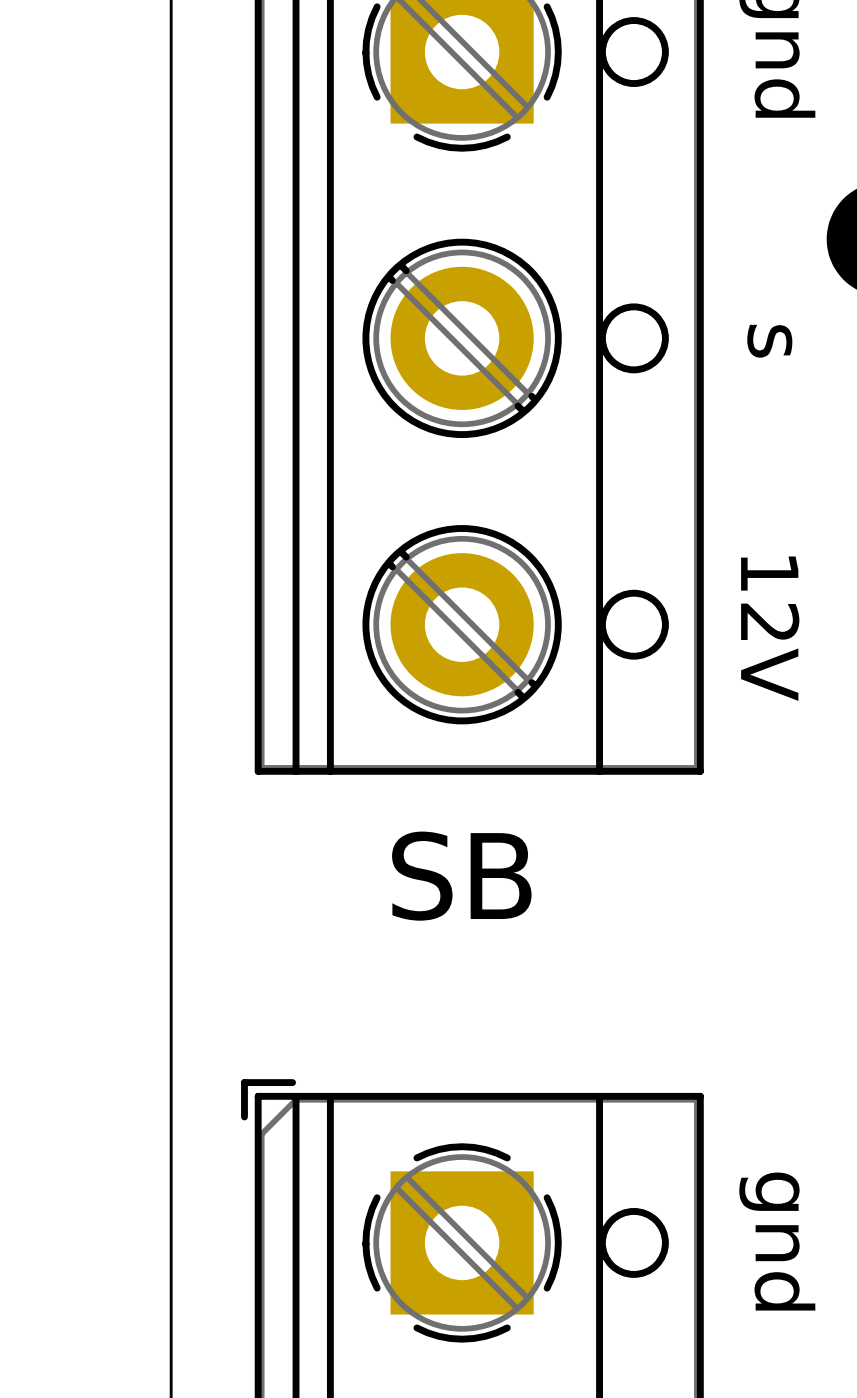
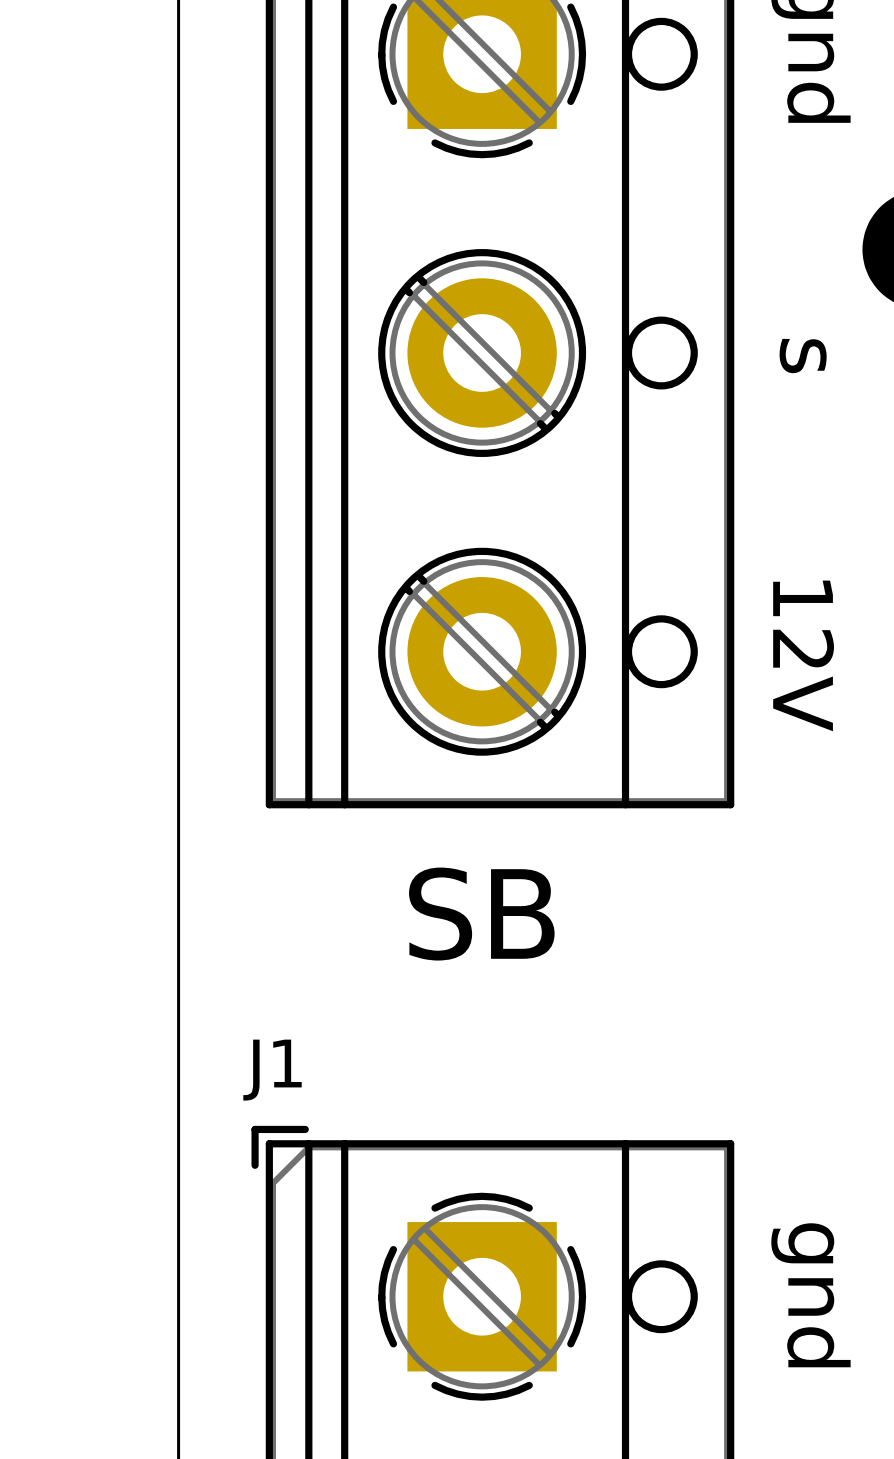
J1 name: none -> J1 (272, 1070)

